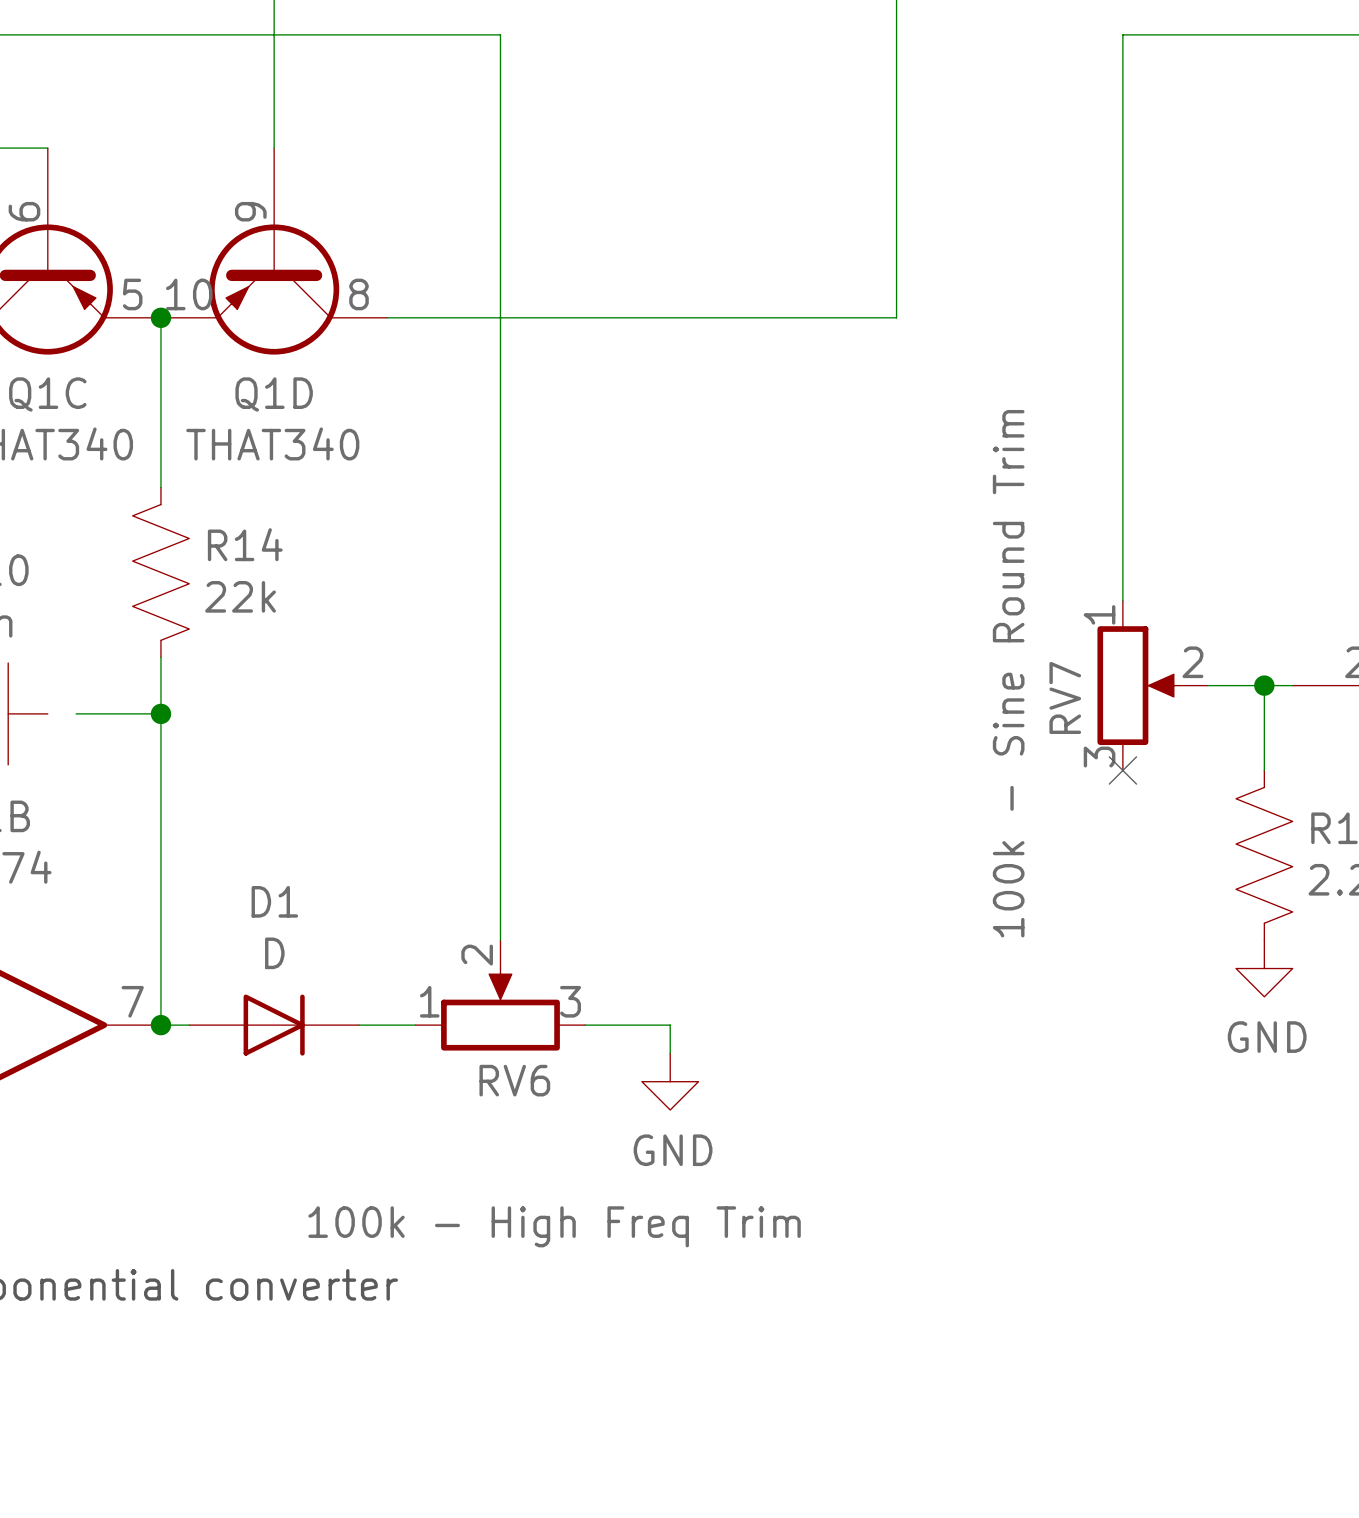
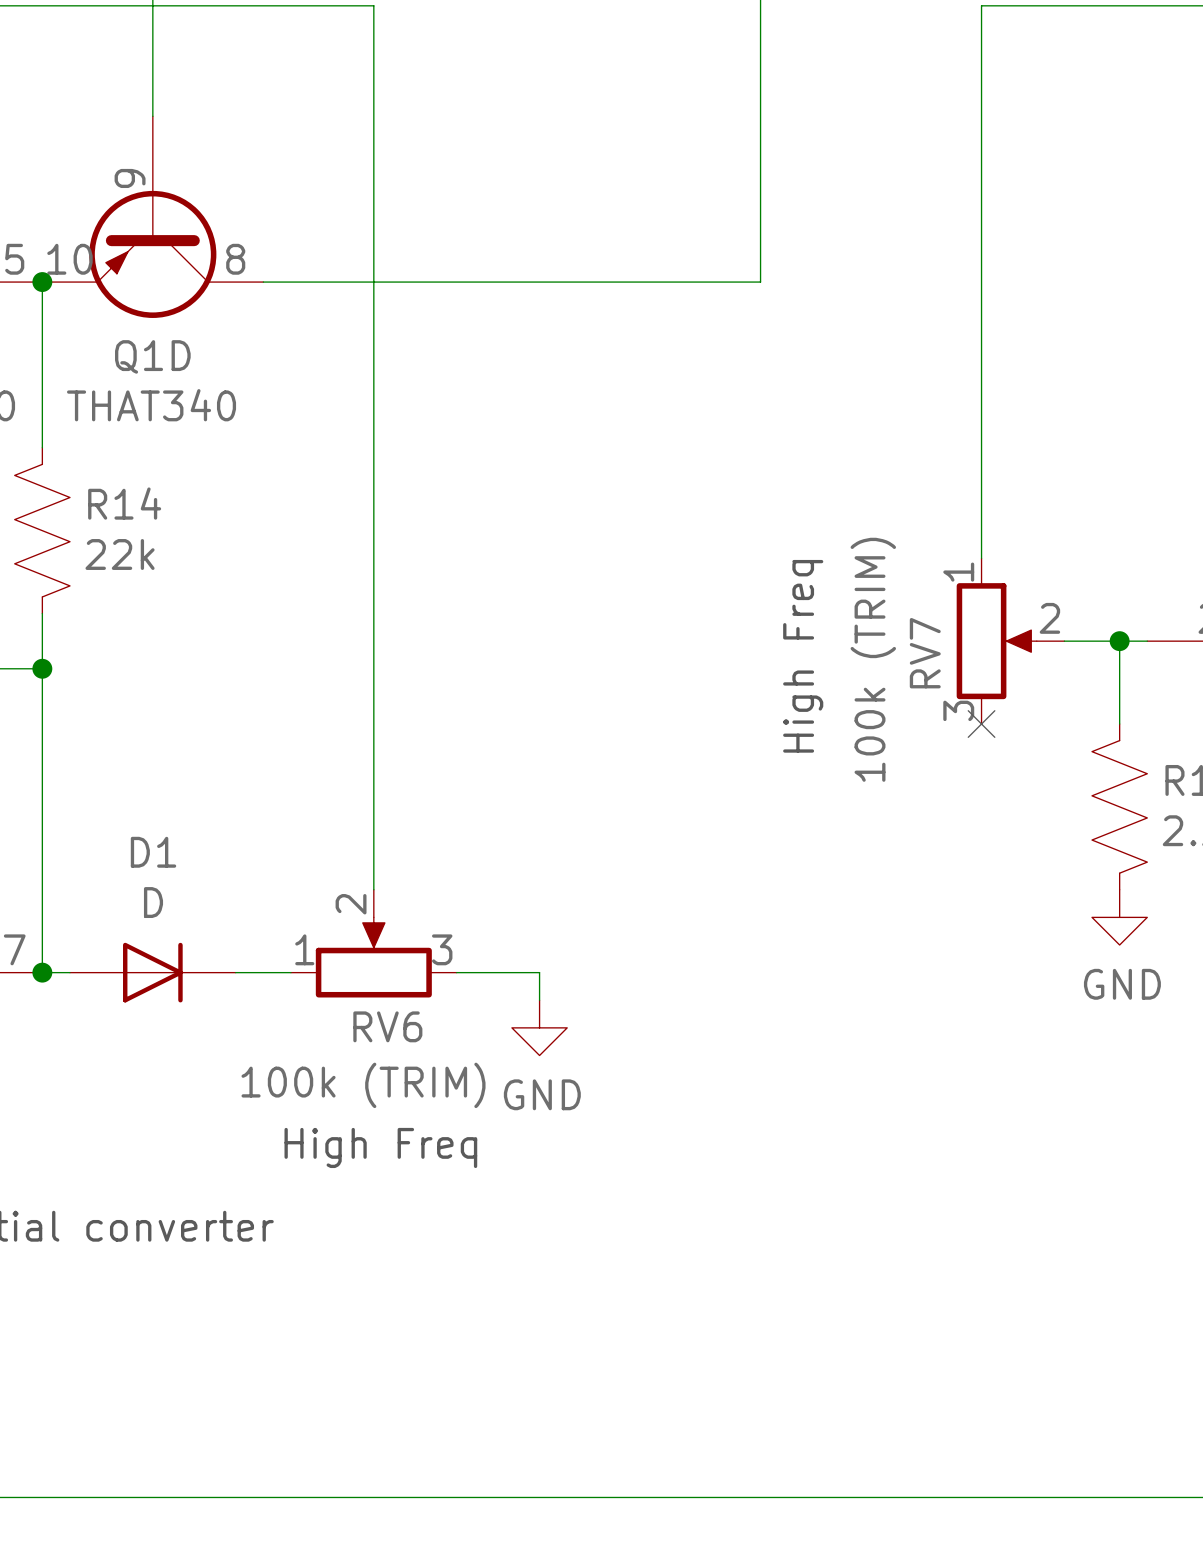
RV7 value: 100k - Sine Round Trim (1008, 673) -> 100k (TRIM) (873, 659)
text: none -> High Freq (803, 656)
text: none -> High Freq (380, 1147)
RV6 value: 100k - High Freq Trim (554, 1226) -> 100k (TRIM) (363, 1085)

